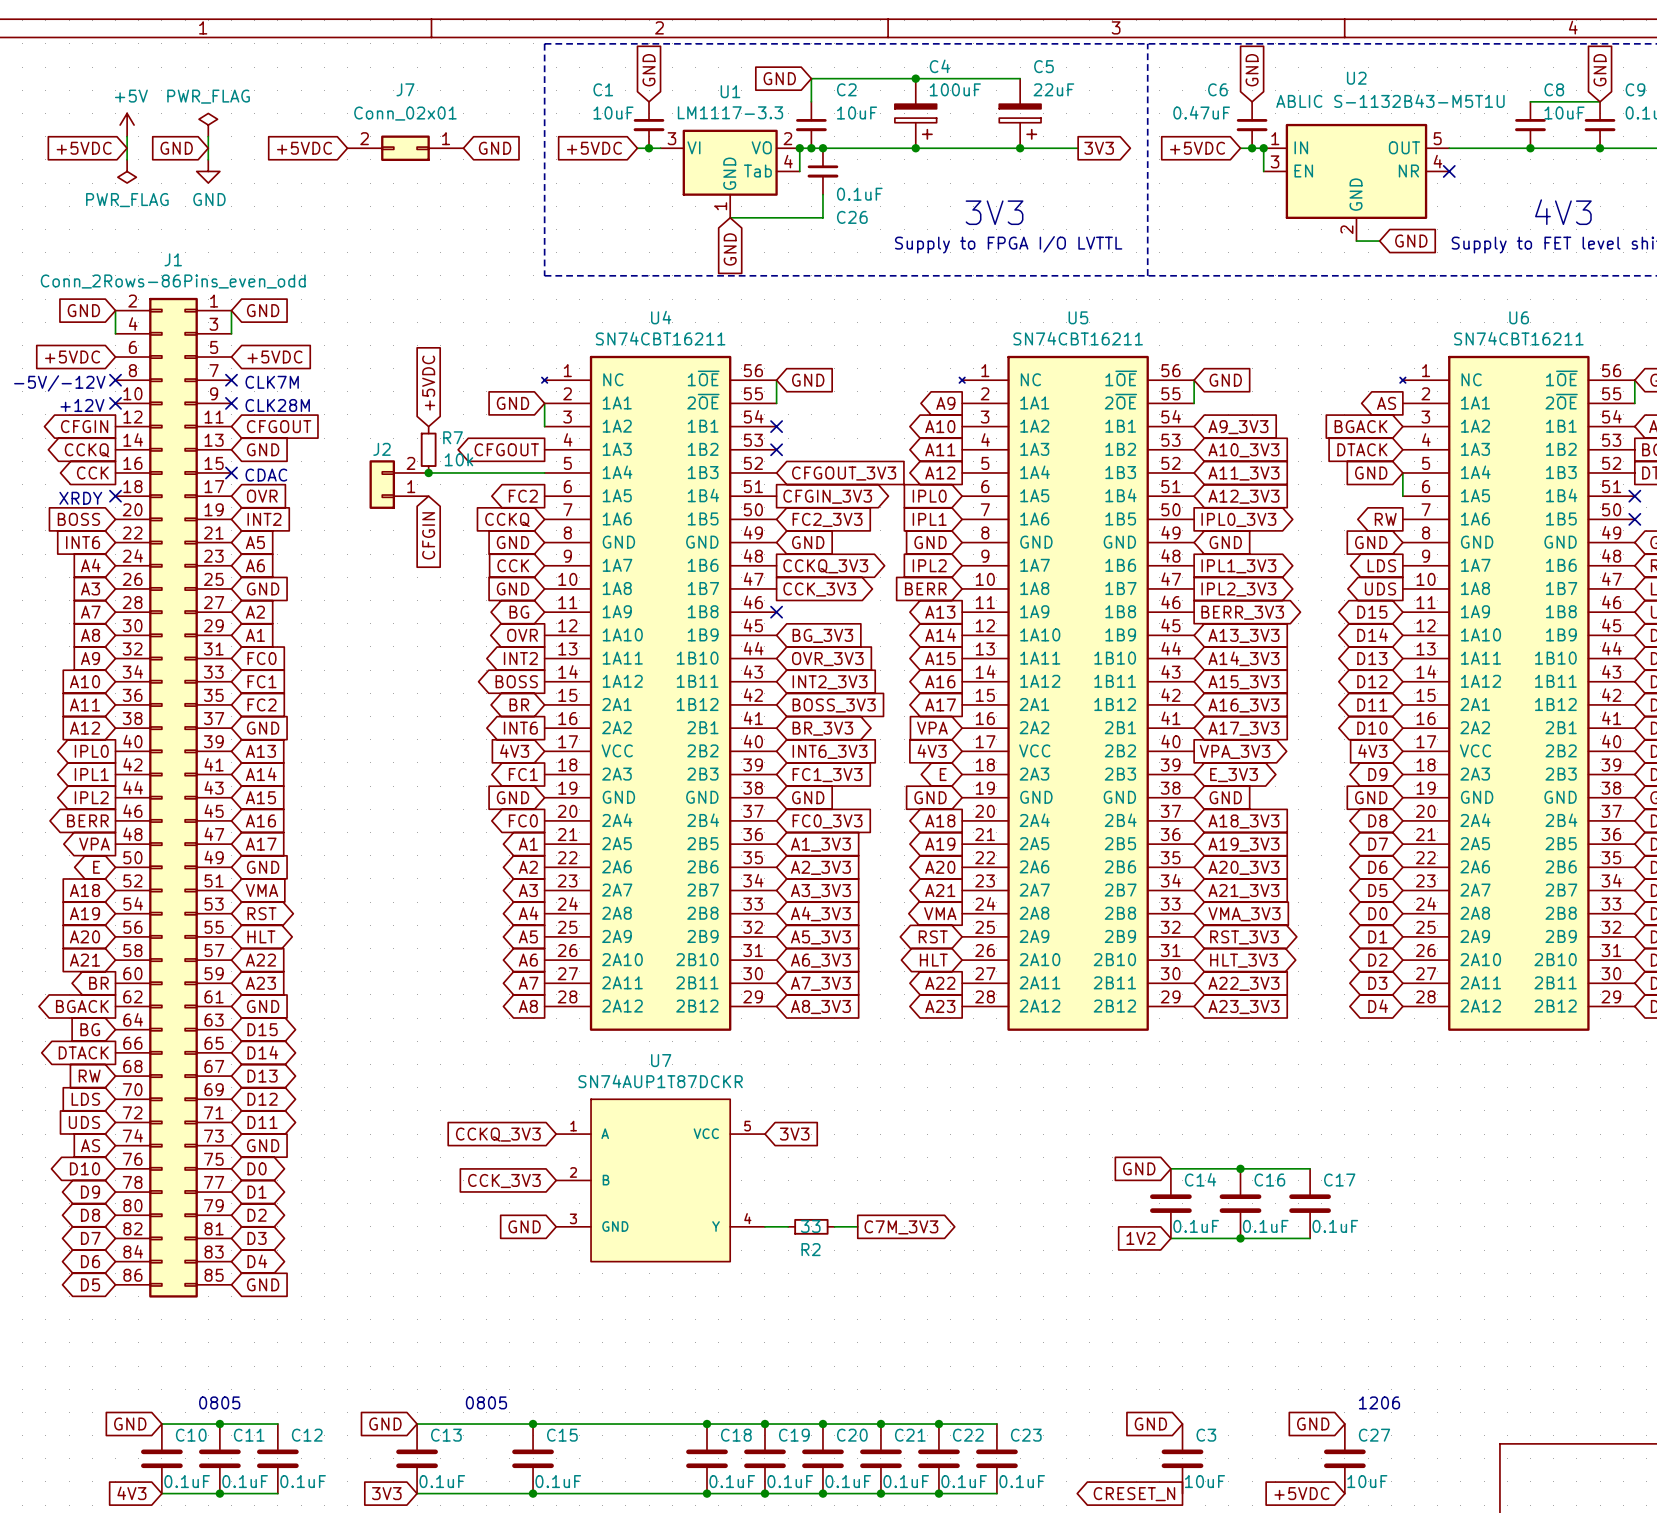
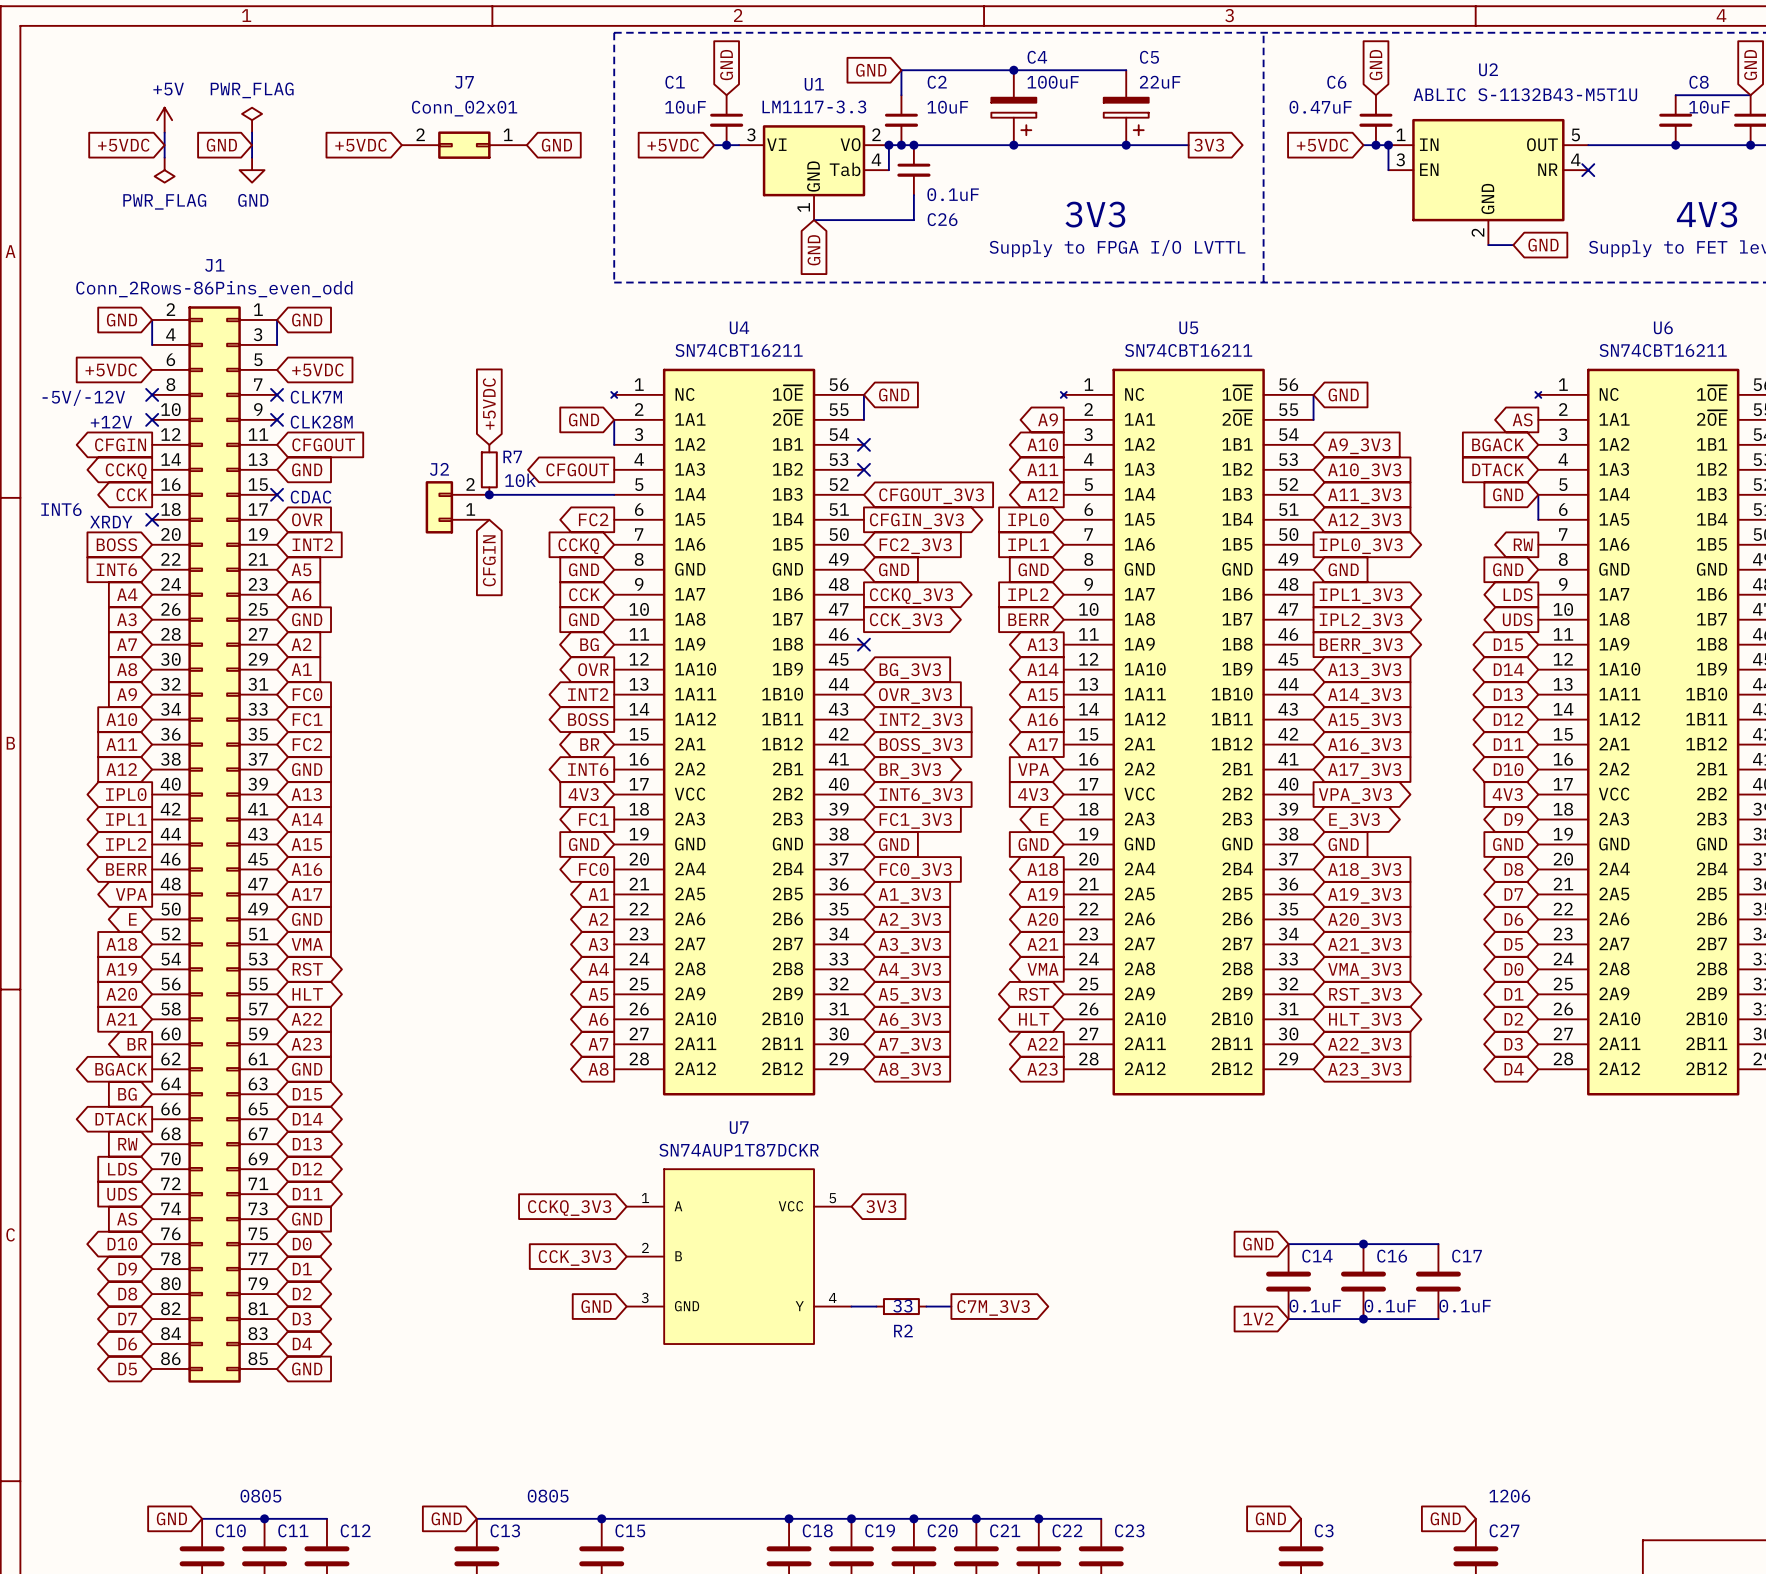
text: none -> INT6 (61, 509)

